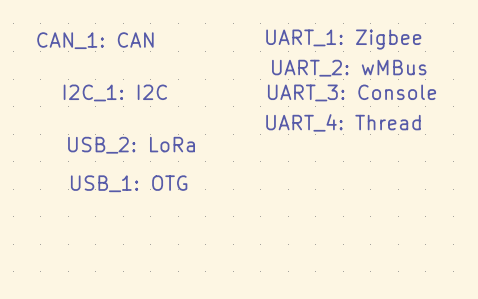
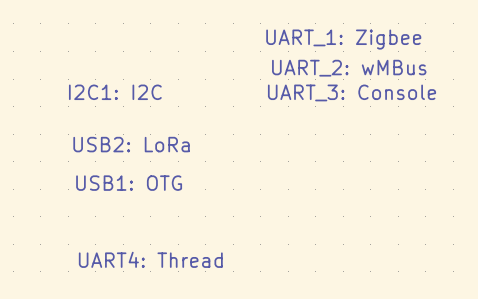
text: CAN_1: CAN (95, 40) -> none
text: I2C_1: I2C (115, 92) -> I2C1: I2C (115, 92)
text: UART_4: Thread (343, 122) -> none
text: USB_2: LoRa (131, 145) -> USB2: LoRa (131, 144)
text: USB_1: OTG (129, 183) -> USB1: OTG (129, 183)
text: none -> UART4: Thread (150, 259)

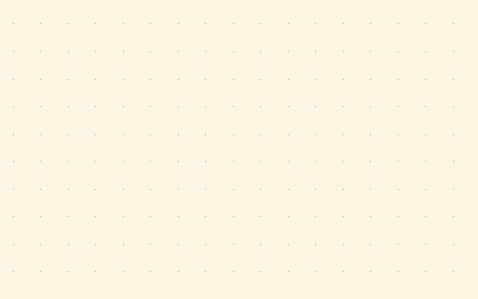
text: UART_1: Zigbee (343, 39) -> none
text: UART_2: wMBus (349, 68) -> none
text: I2C1: I2C (115, 92) -> none
text: UART_3: Console (352, 92) -> none
text: USB2: LoRa (131, 144) -> none
text: USB1: OTG (129, 183) -> none
text: UART4: Thread (150, 259) -> none

